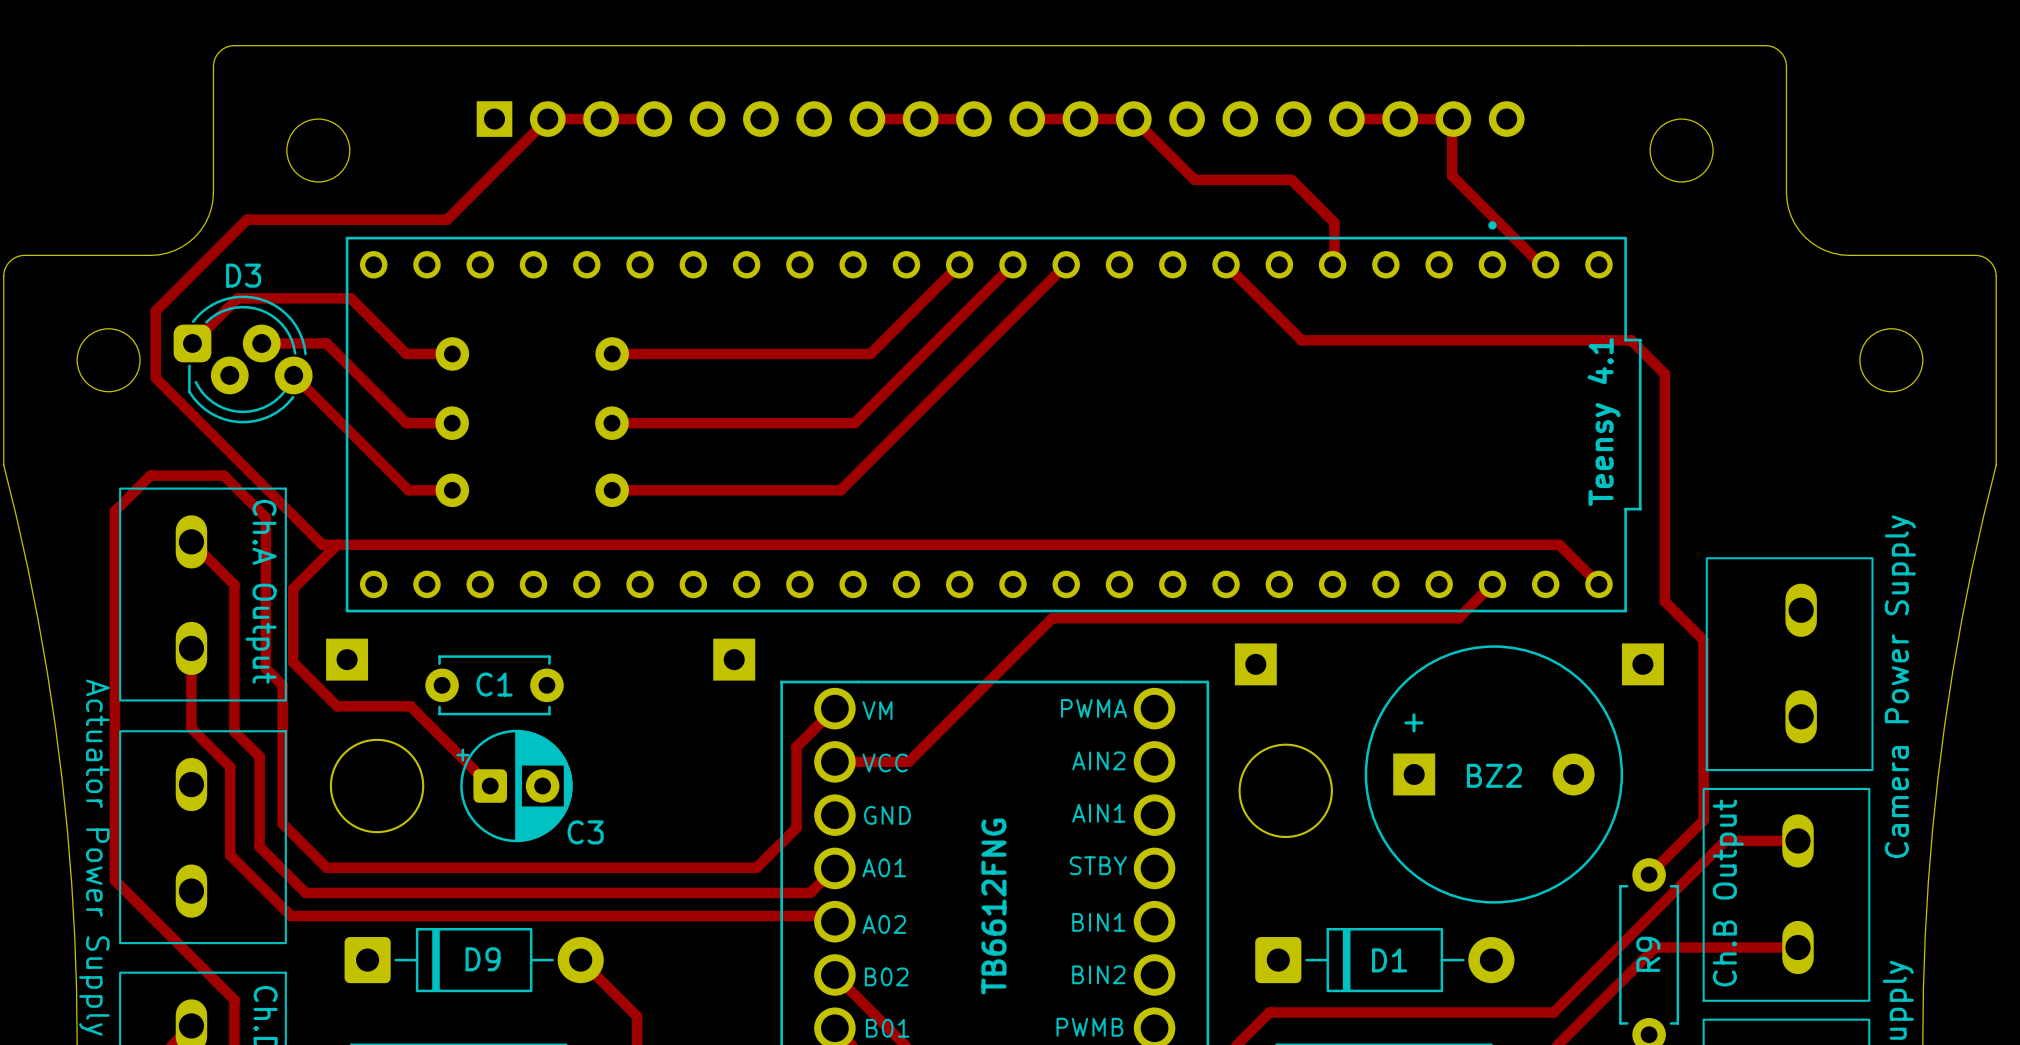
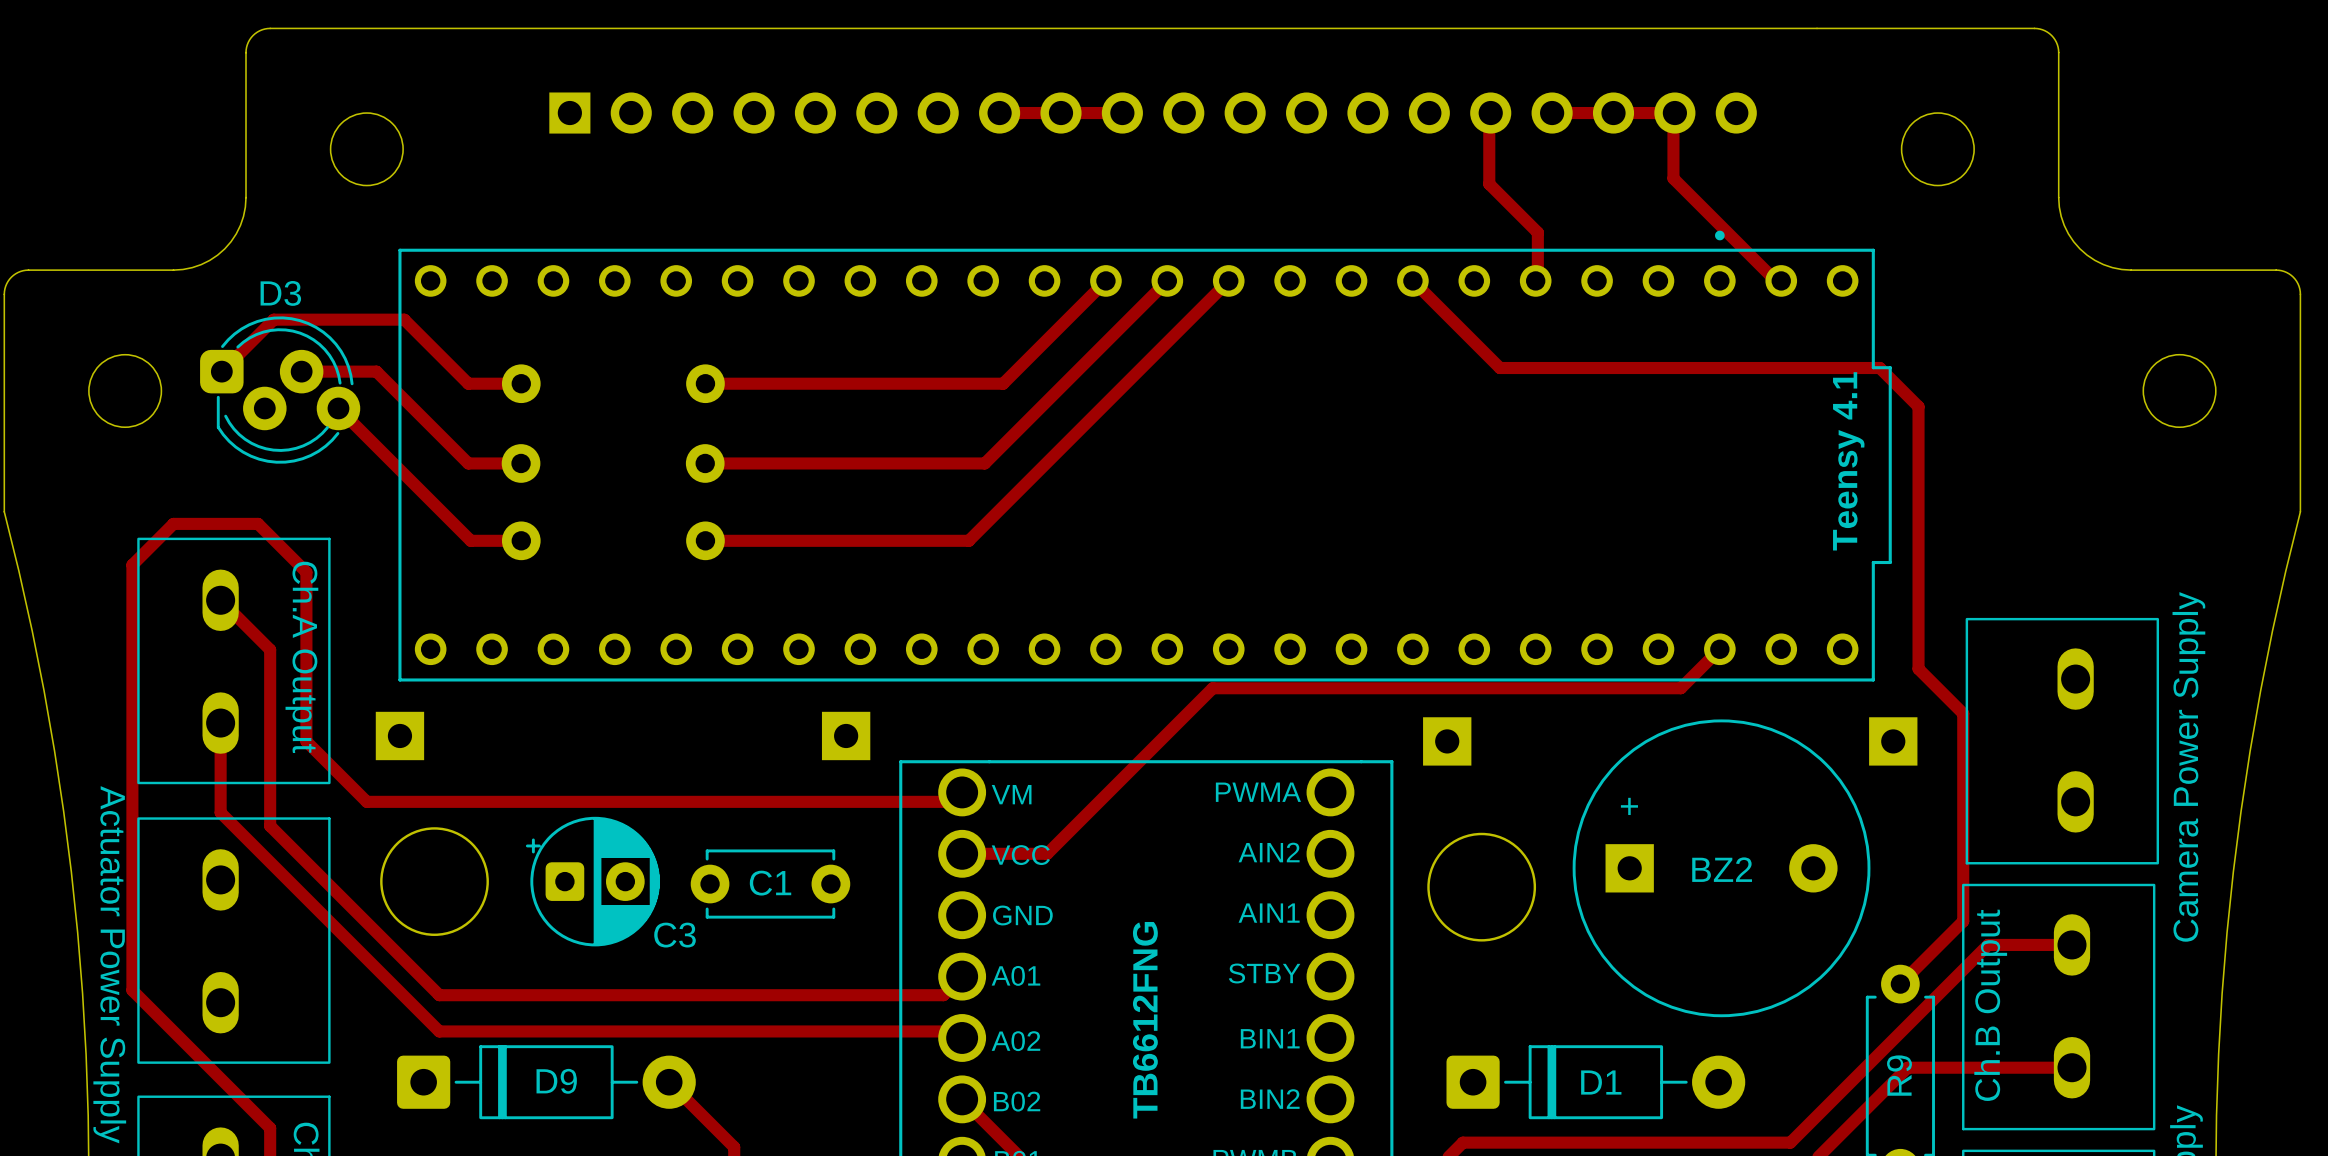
track: (654, 119) (547, 119) (447, 219) (247, 219) (155, 310) (155, 378) (322, 544) (1559, 544) (1598, 584) -> none
track: (1027, 119) (1133, 119) (1194, 179) (1292, 180) -> (1489, 113) (1489, 184)
track: (337, 544) (293, 588) (293, 662) (337, 706) (410, 706) (490, 786) -> none
track: (265, 664) (265, 668) (282, 685) (282, 823) (326, 867) (756, 867) (796, 827) (796, 747) (826, 716) -> (306, 741) (366, 801) (952, 801)
C1 position: (494, 685) -> (770, 884)
track: (191, 726) (230, 767) (230, 855) (291, 916) (381, 916) -> (220, 812) (439, 1031)
track: (234, 731) (259, 756) (259, 846) (305, 892) (810, 892) (818, 884) -> (270, 818) (270, 826) (439, 995) (943, 995)

